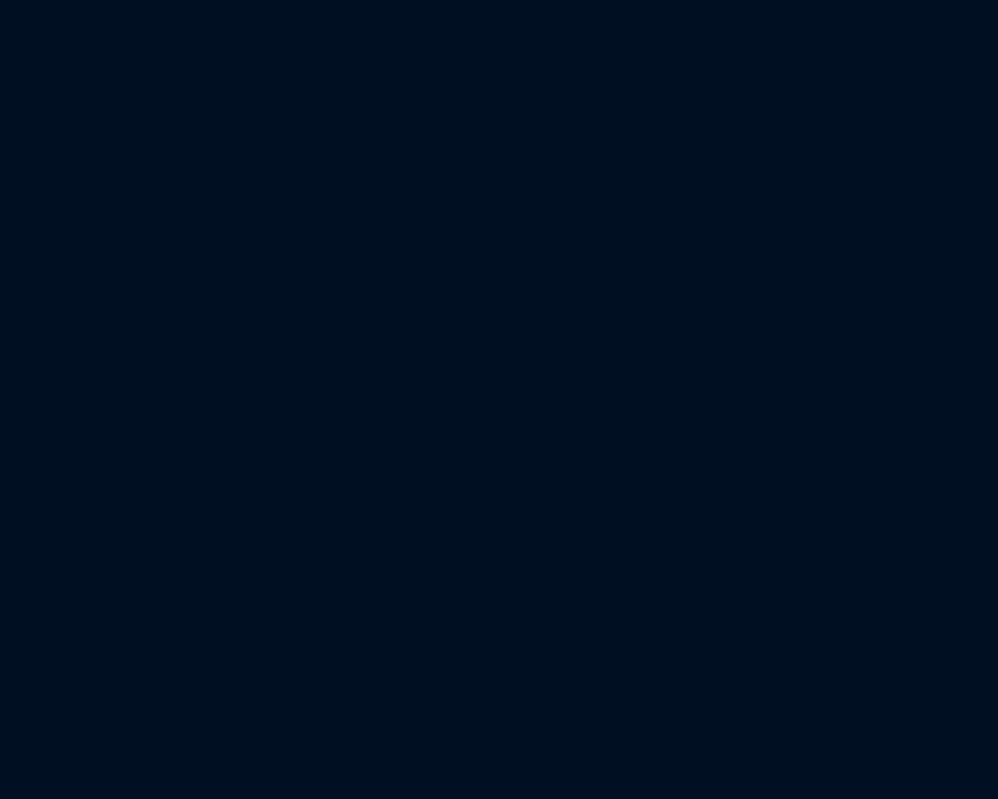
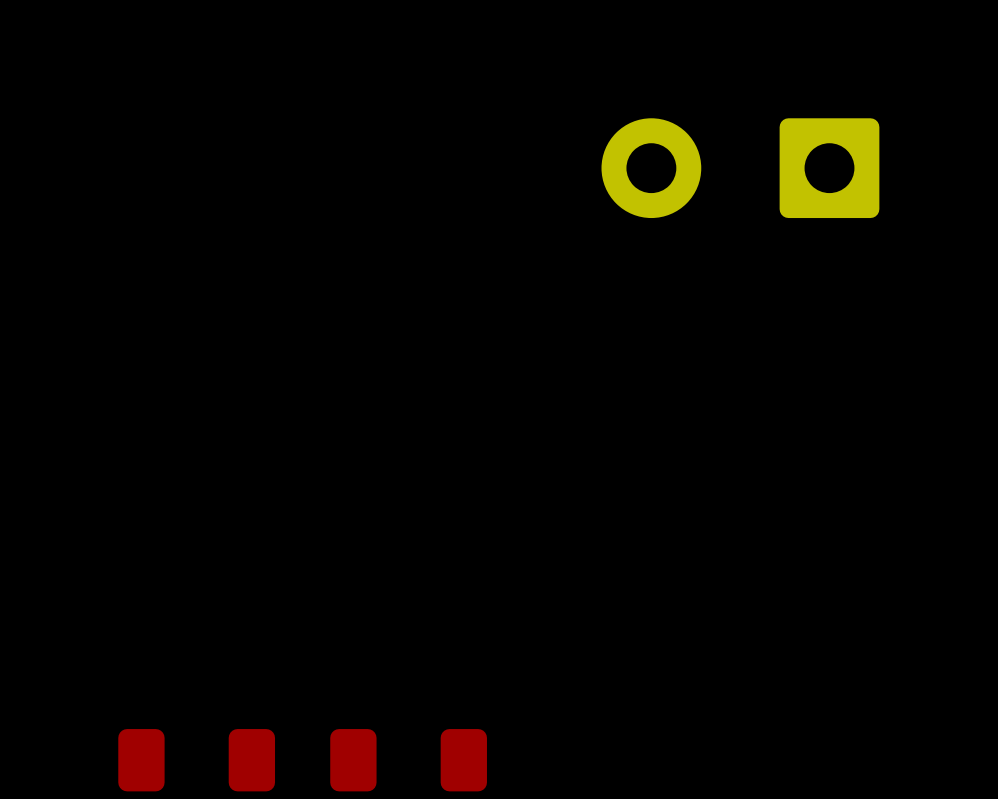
part: none -> (740, 168)
part: none -> (196, 760)
part: none -> (408, 760)

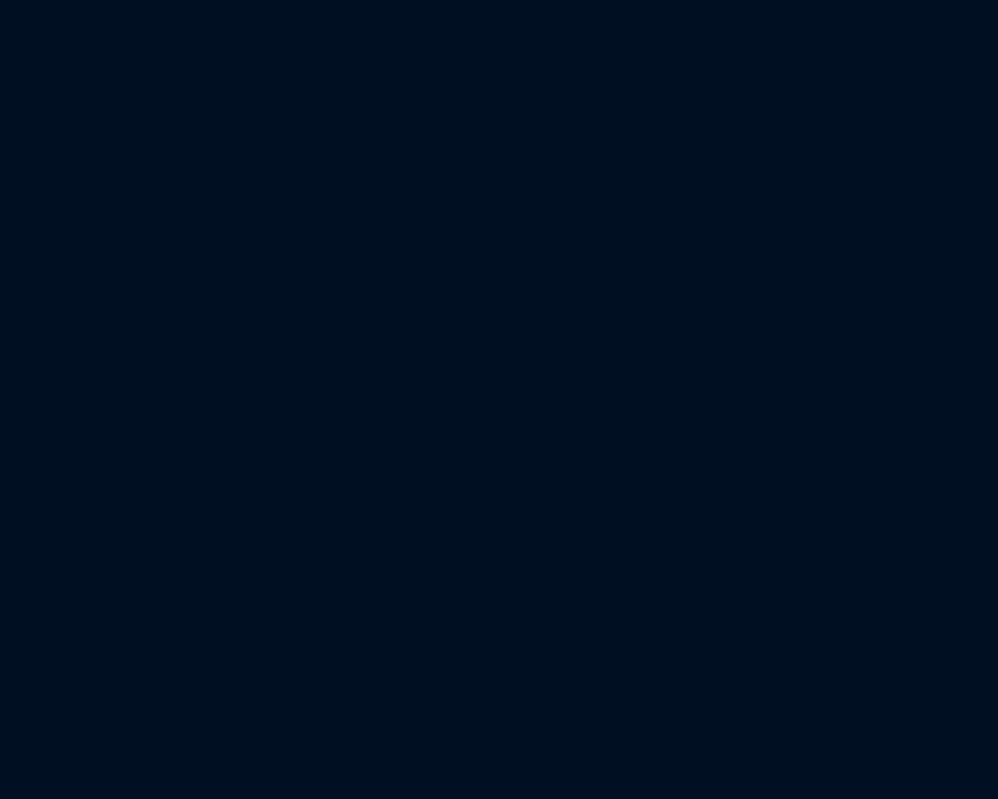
part: (740, 168) -> none
part: (196, 760) -> none
part: (408, 760) -> none

